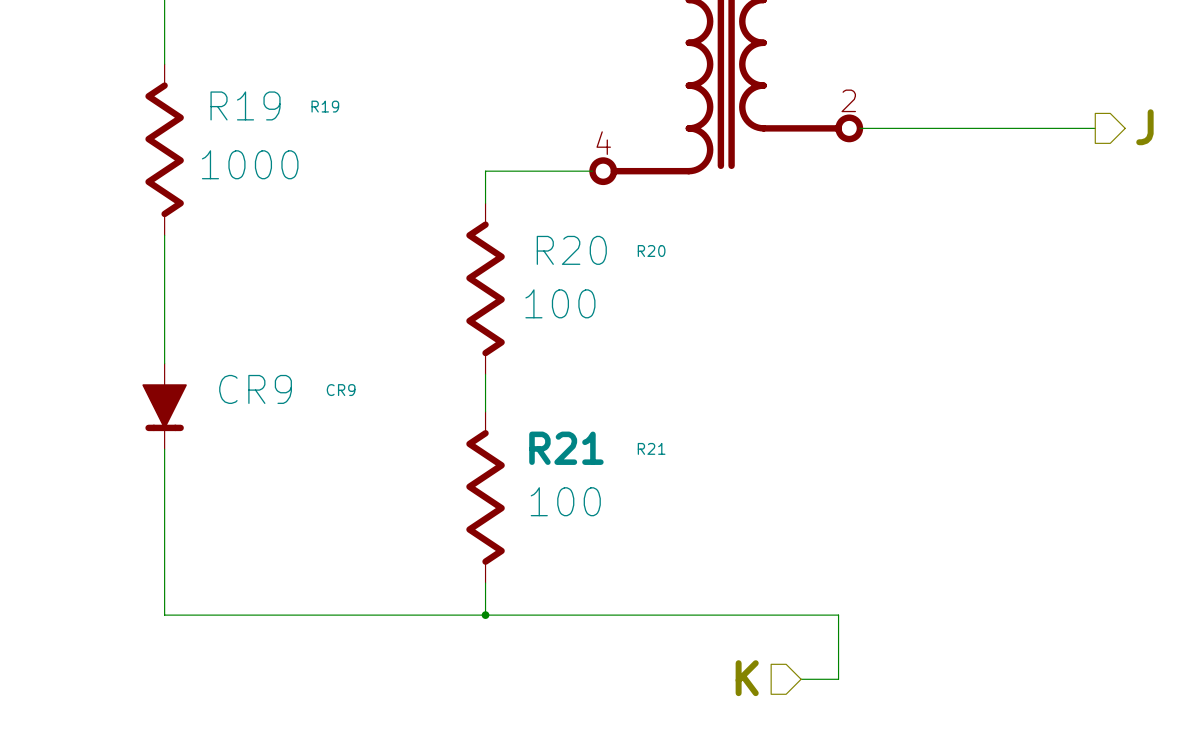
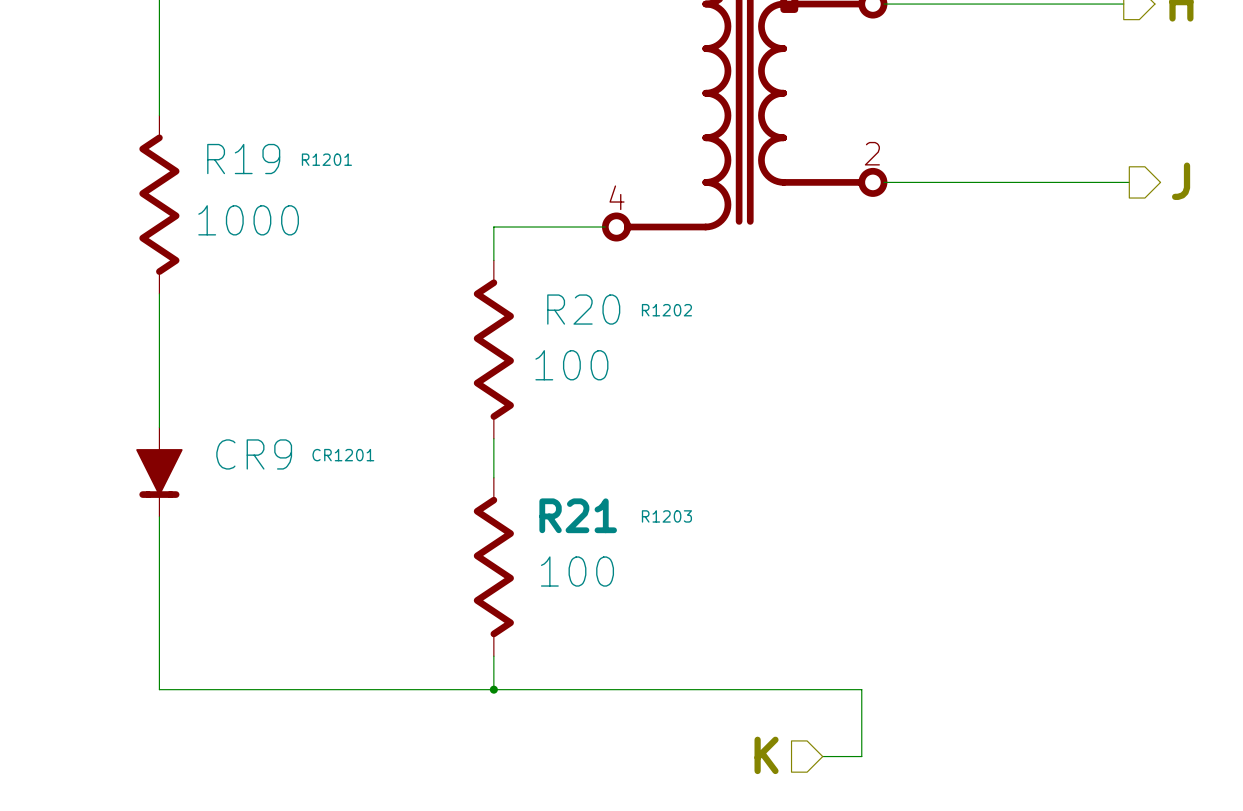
R19 name: R19 (325, 106) -> R1201 (326, 159)
R20 name: R20 (651, 251) -> R1202 (666, 310)
CR9 name: CR9 (341, 390) -> CR1201 (343, 455)
R21 name: R21 (651, 448) -> R1203 (666, 516)

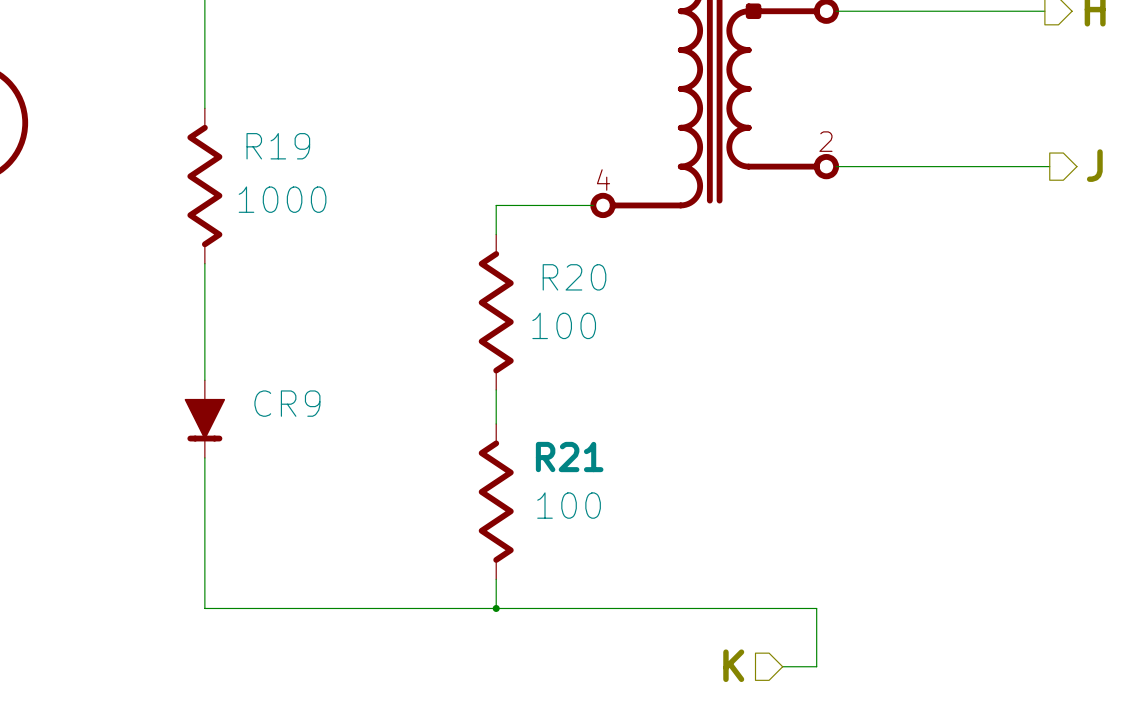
R1201 name: R1201 (326, 159) -> none
R1202 name: R1202 (666, 310) -> none
CR1201 name: CR1201 (343, 455) -> none
R1203 name: R1203 (666, 516) -> none

